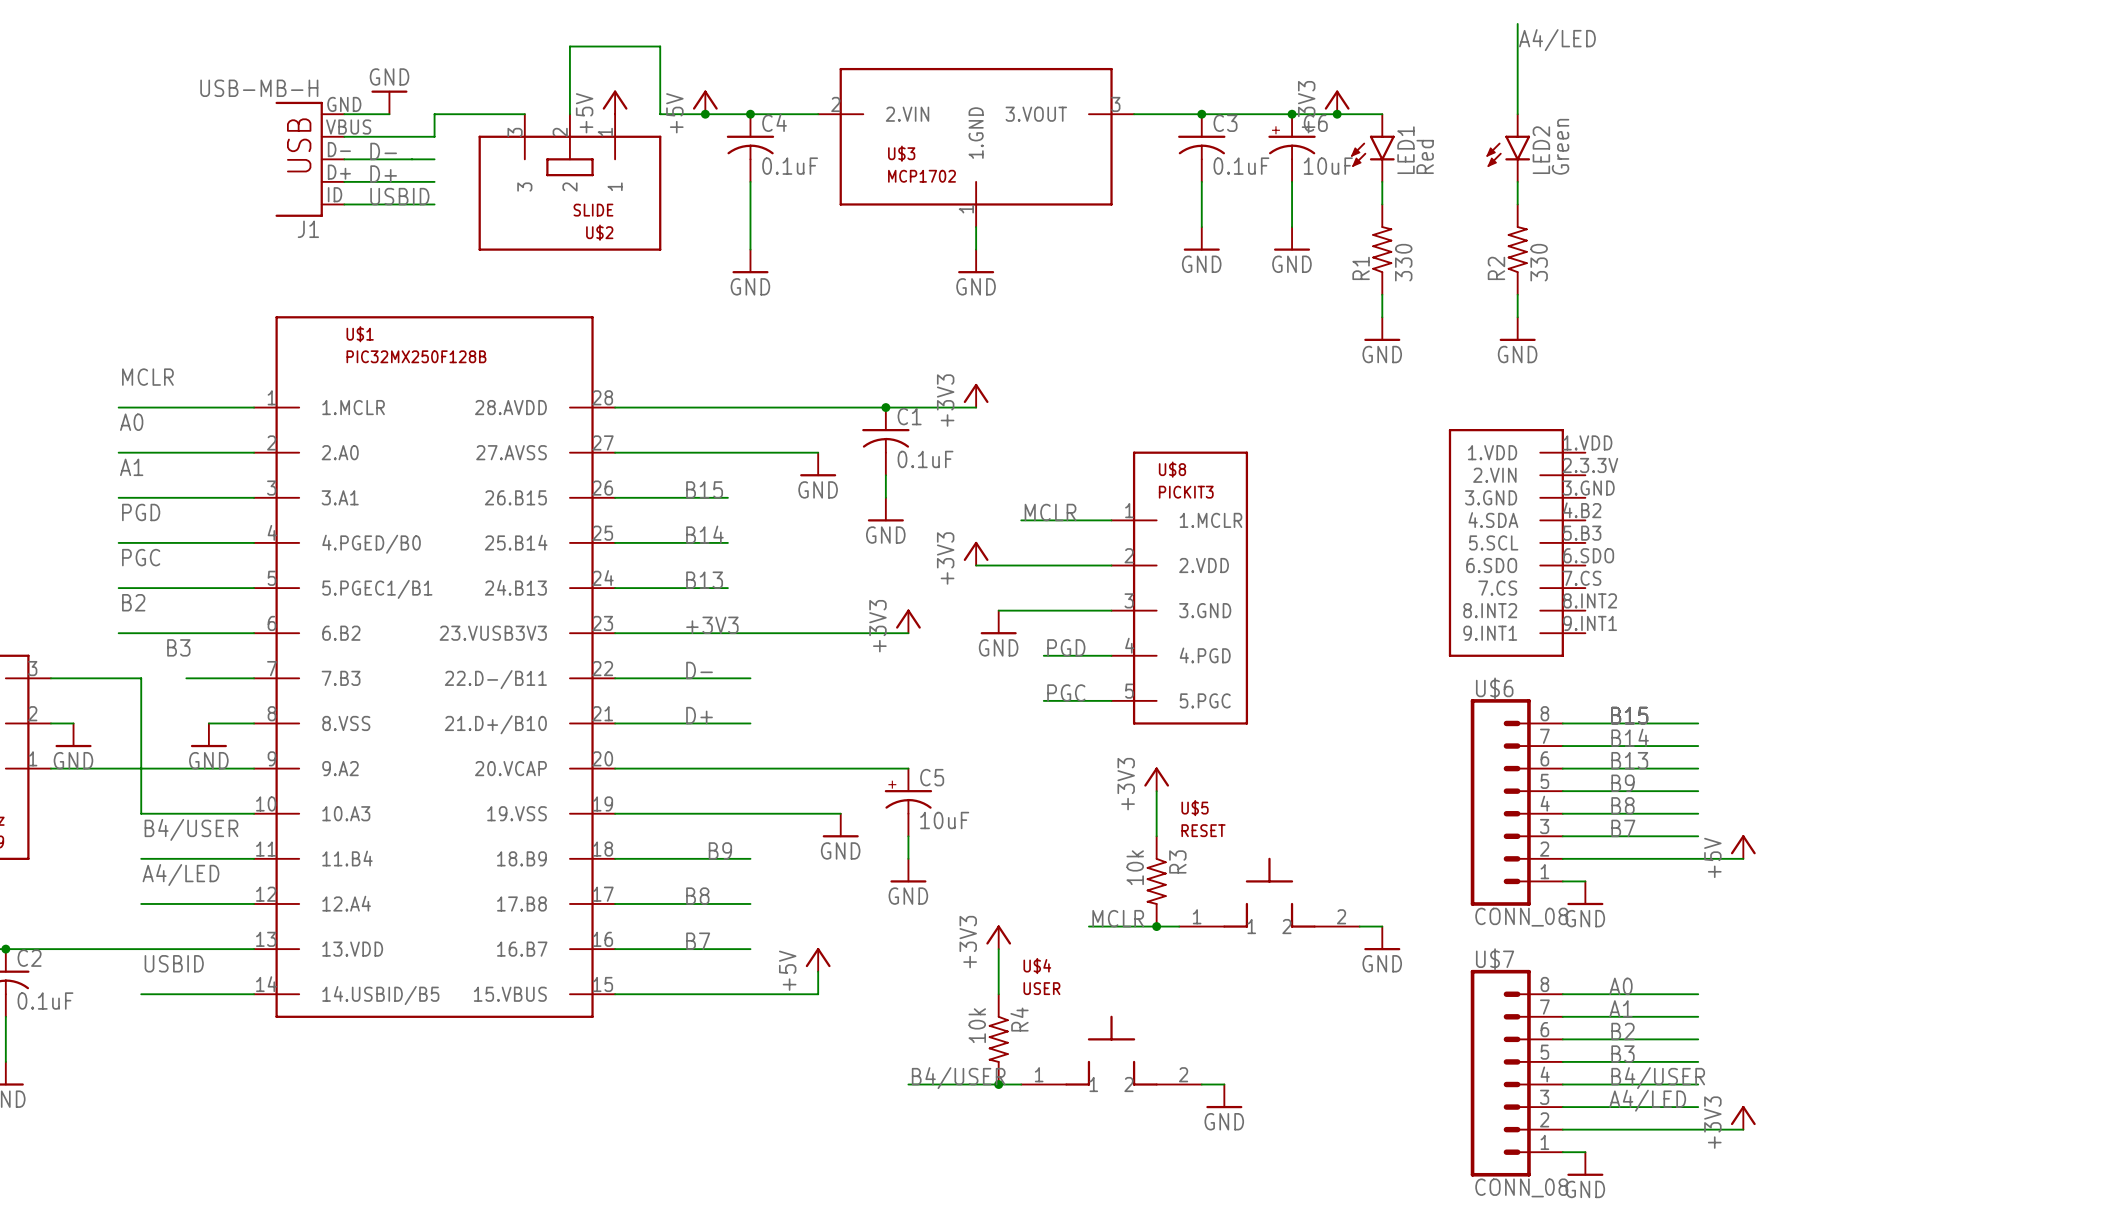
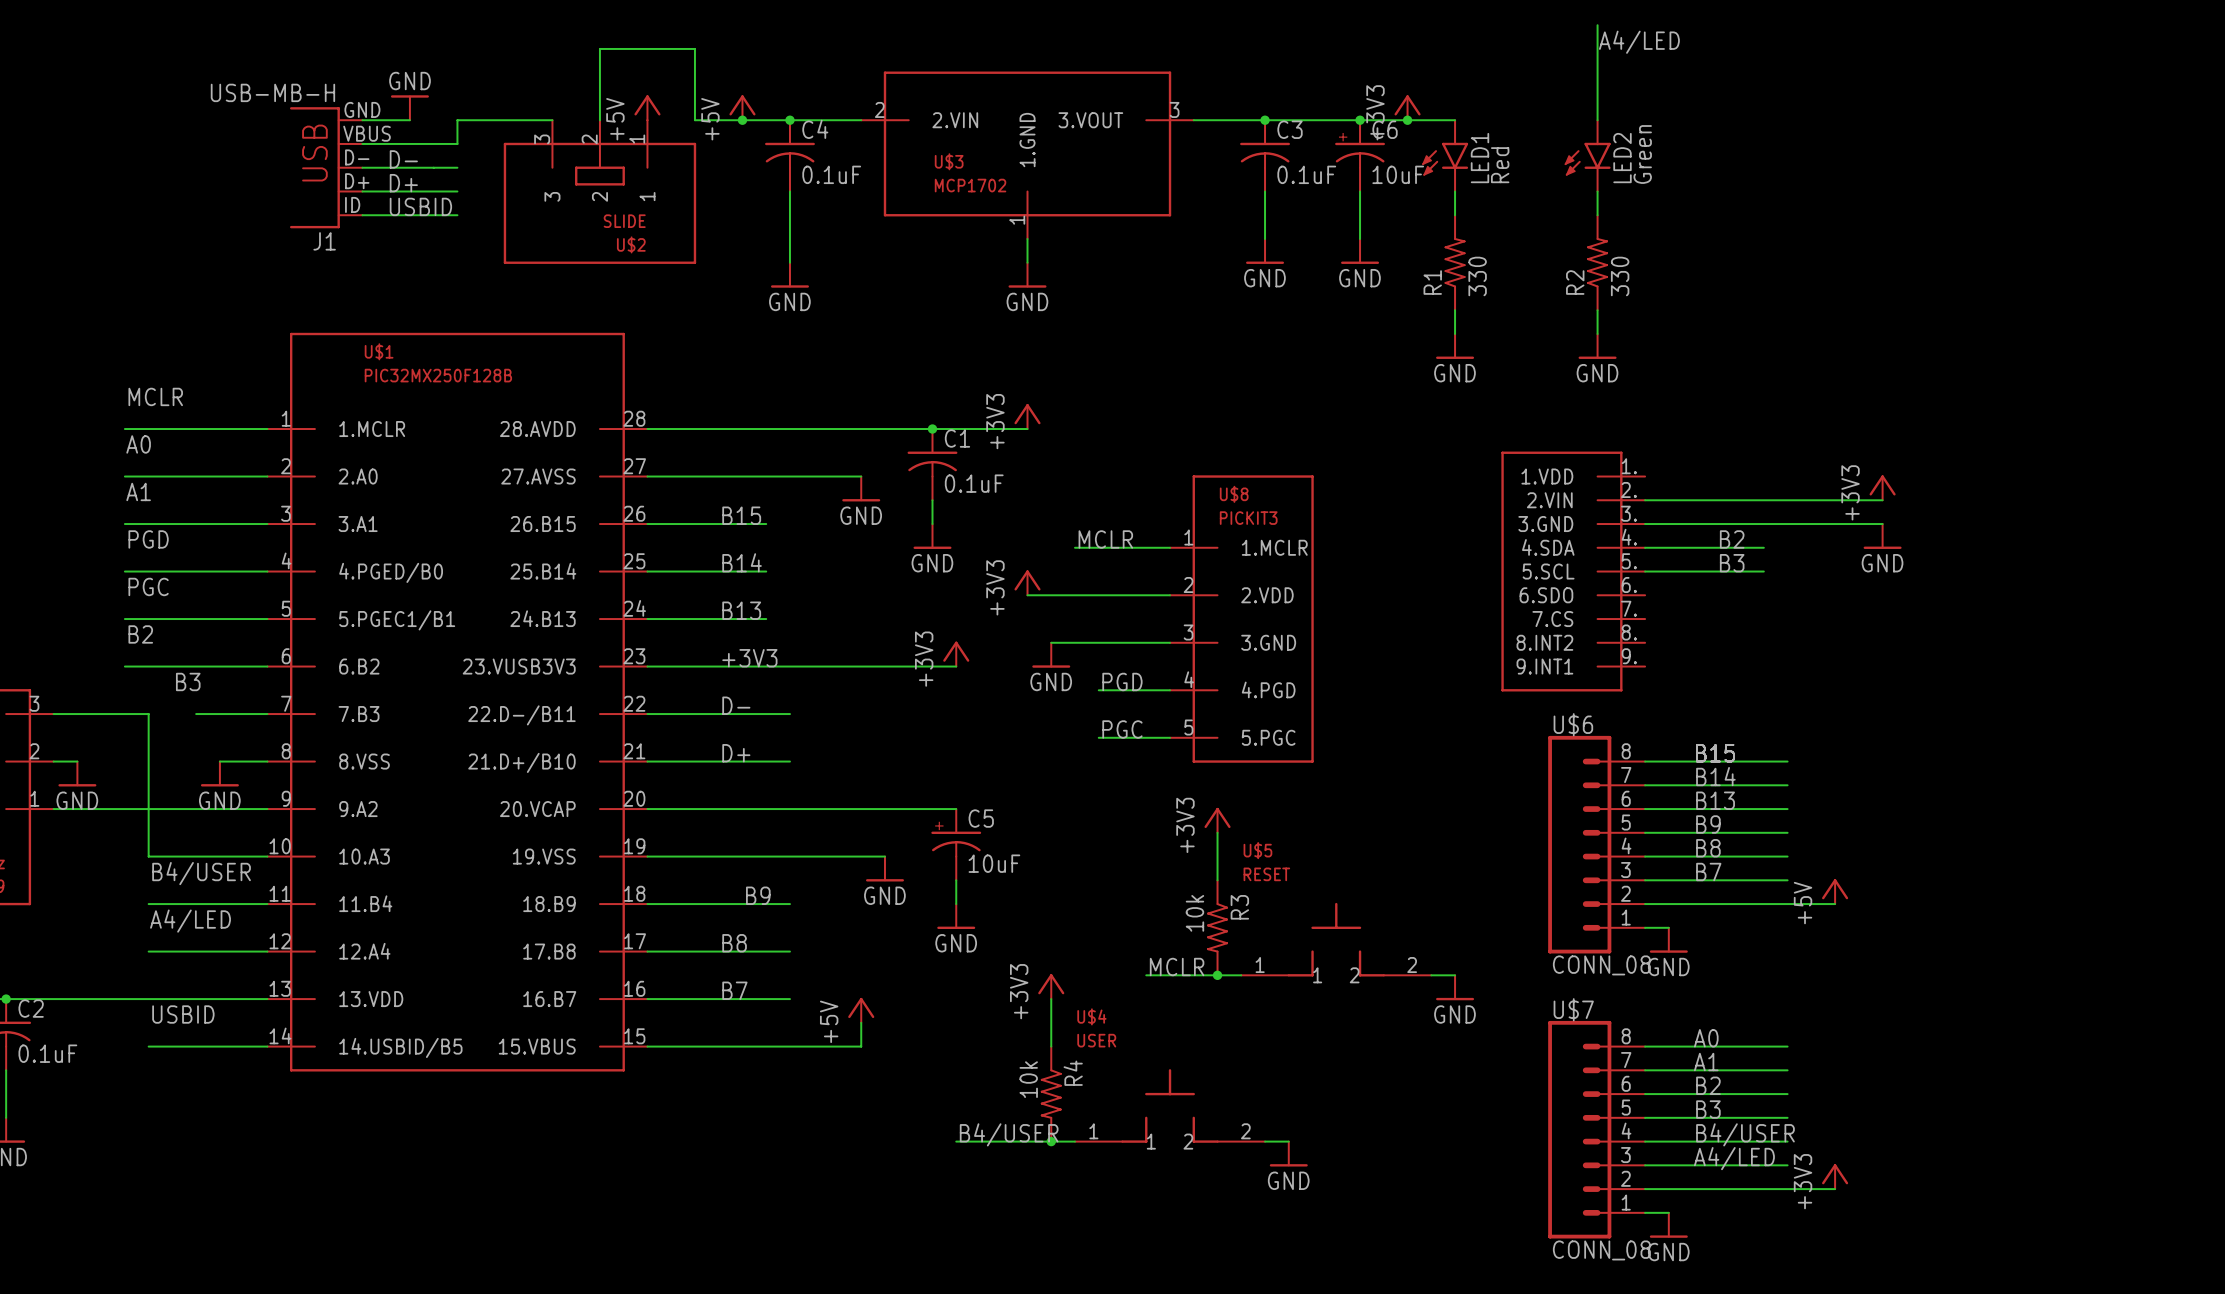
power symbol: none -> +3V3 (1882, 487)
wire: none -> (1645, 500) (1882, 500)
wire: none -> (1645, 524) (1882, 524)
power symbol: none -> GND (1882, 536)
label: none -> B2 (1732, 539)
wire: none -> (1645, 547) (1763, 547)
label: none -> B3 (1732, 563)
part: none -> (1573, 571)
part: (1517, 542) -> none
wire: none -> (1645, 571) (1763, 571)

